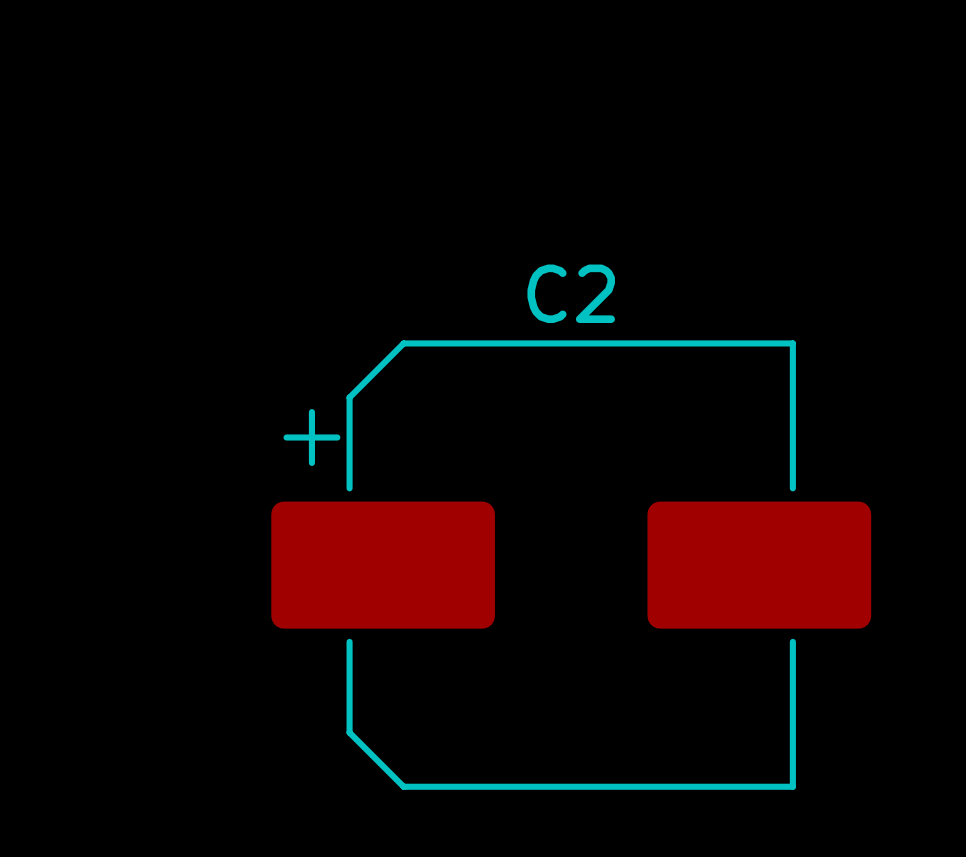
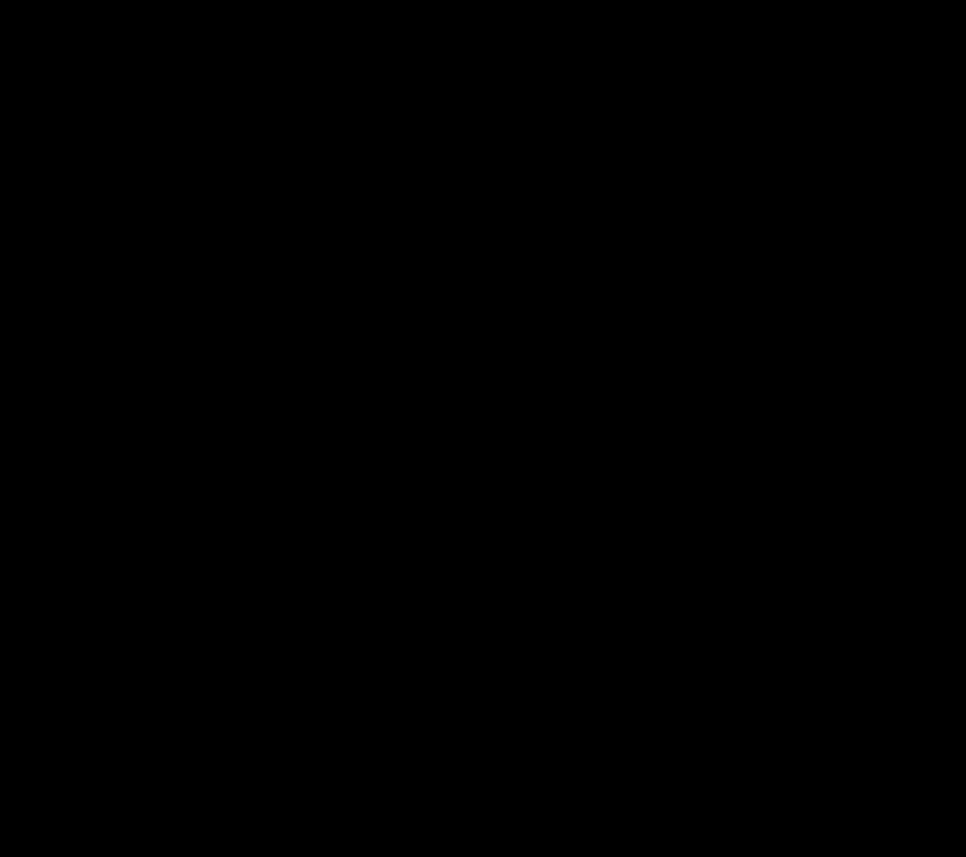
C2: (571, 565) -> none

